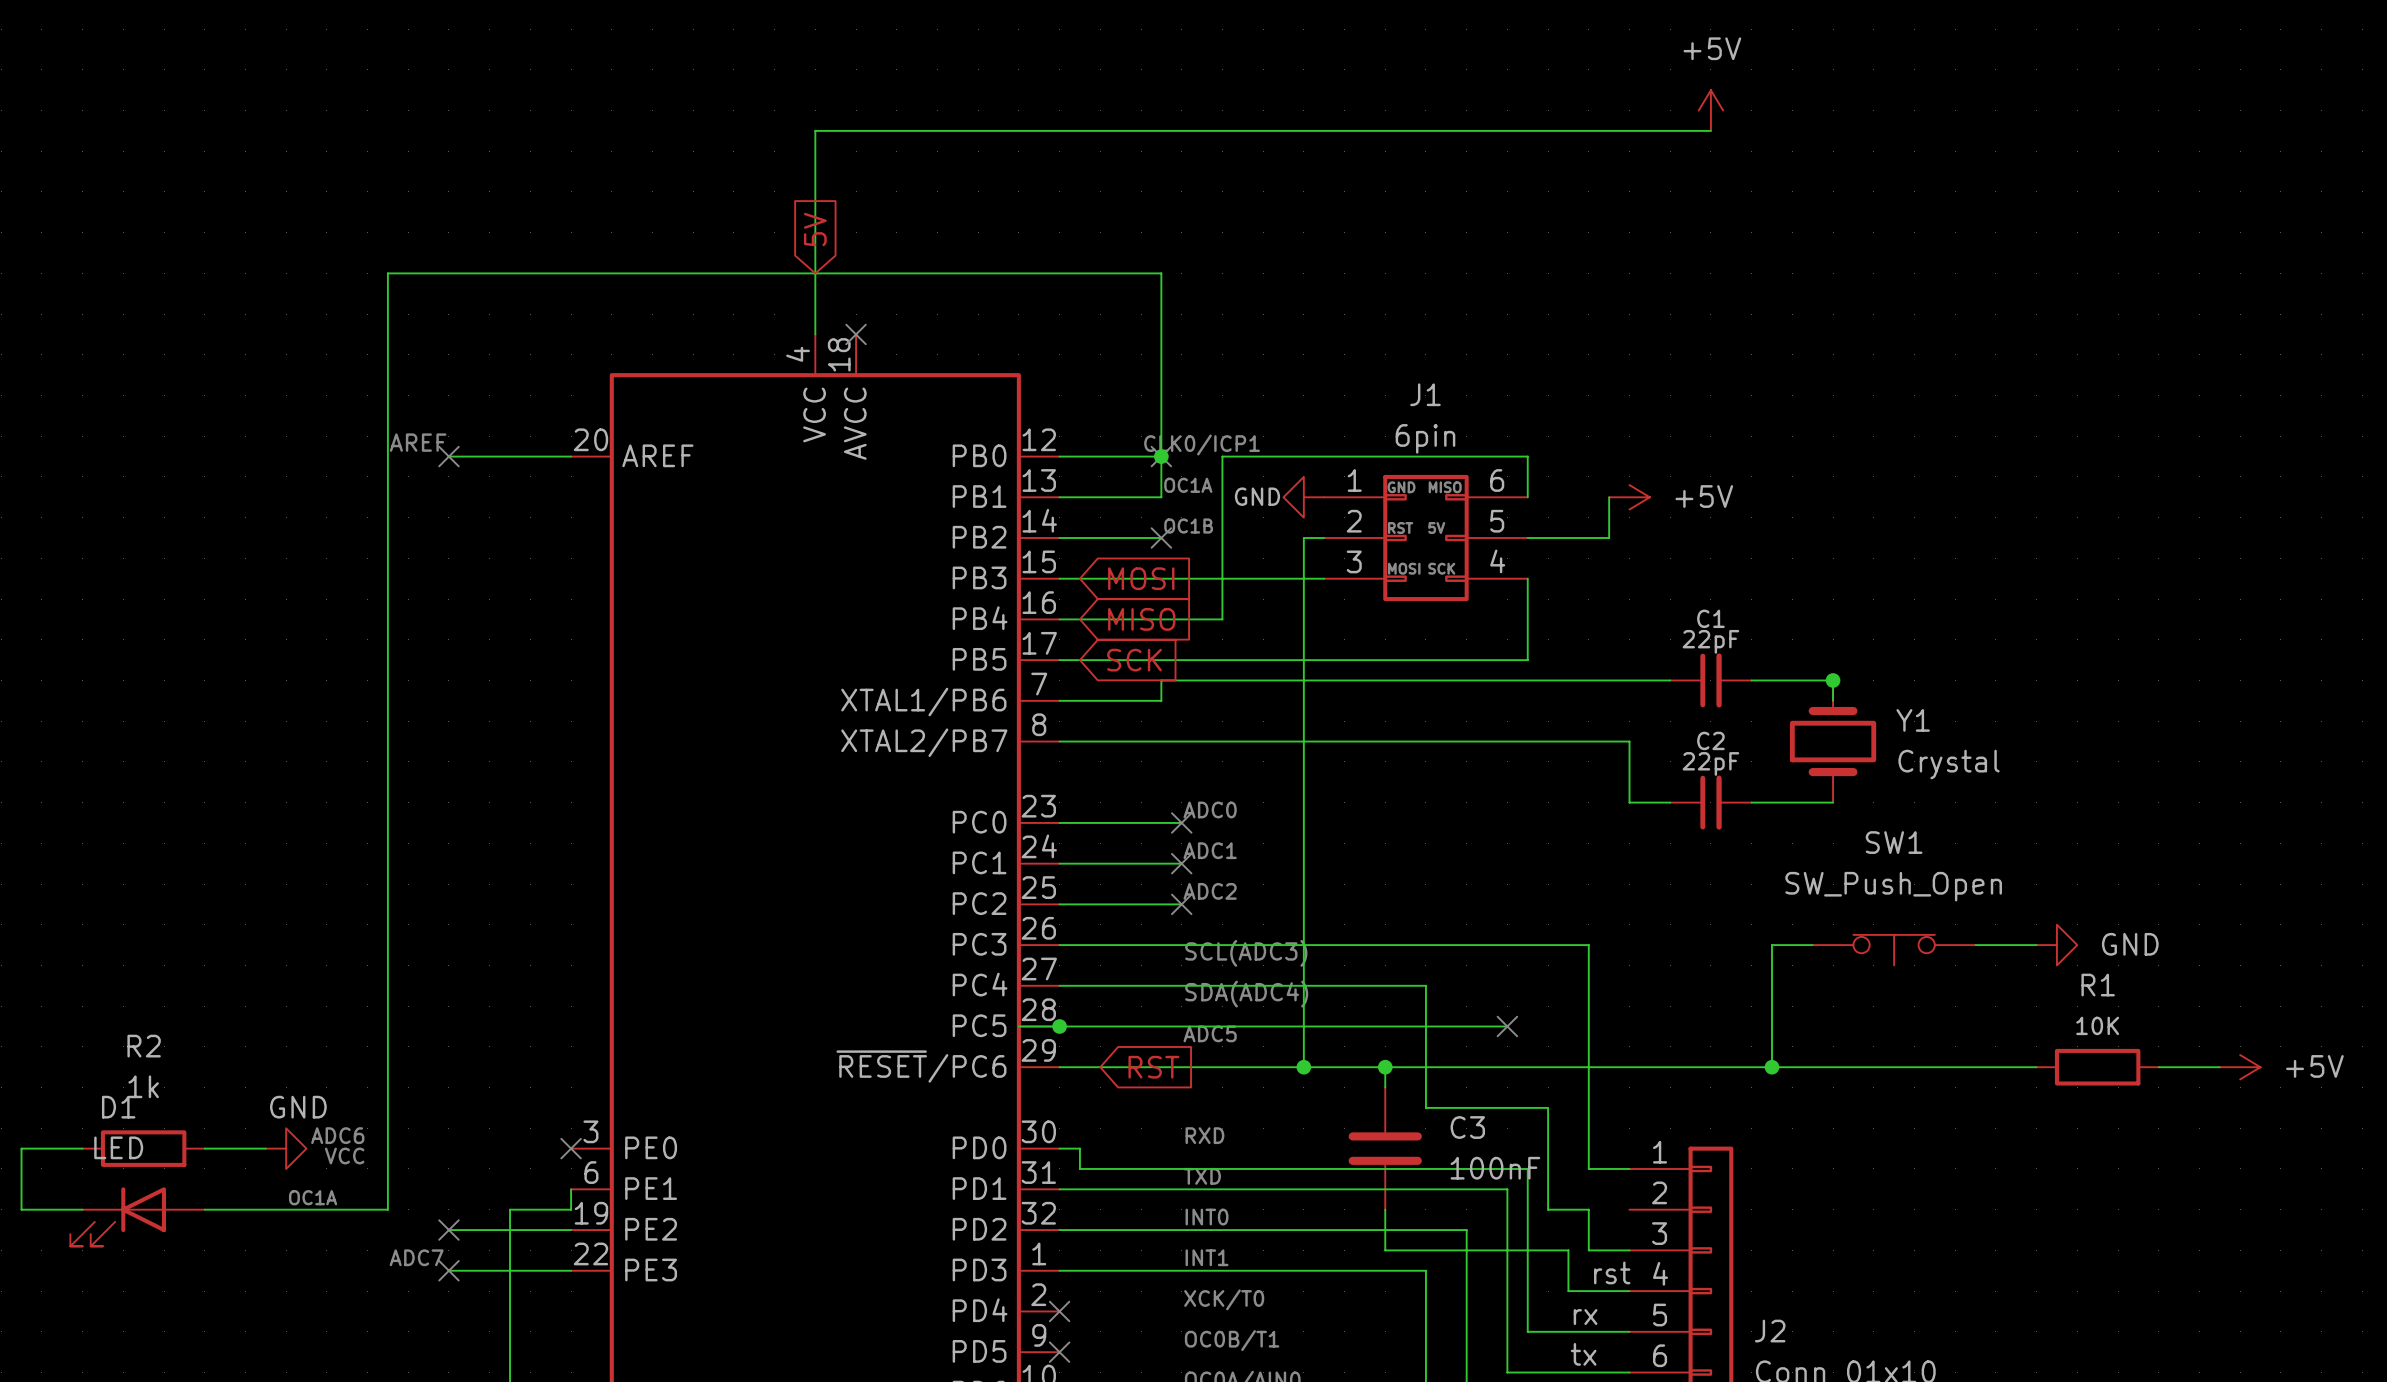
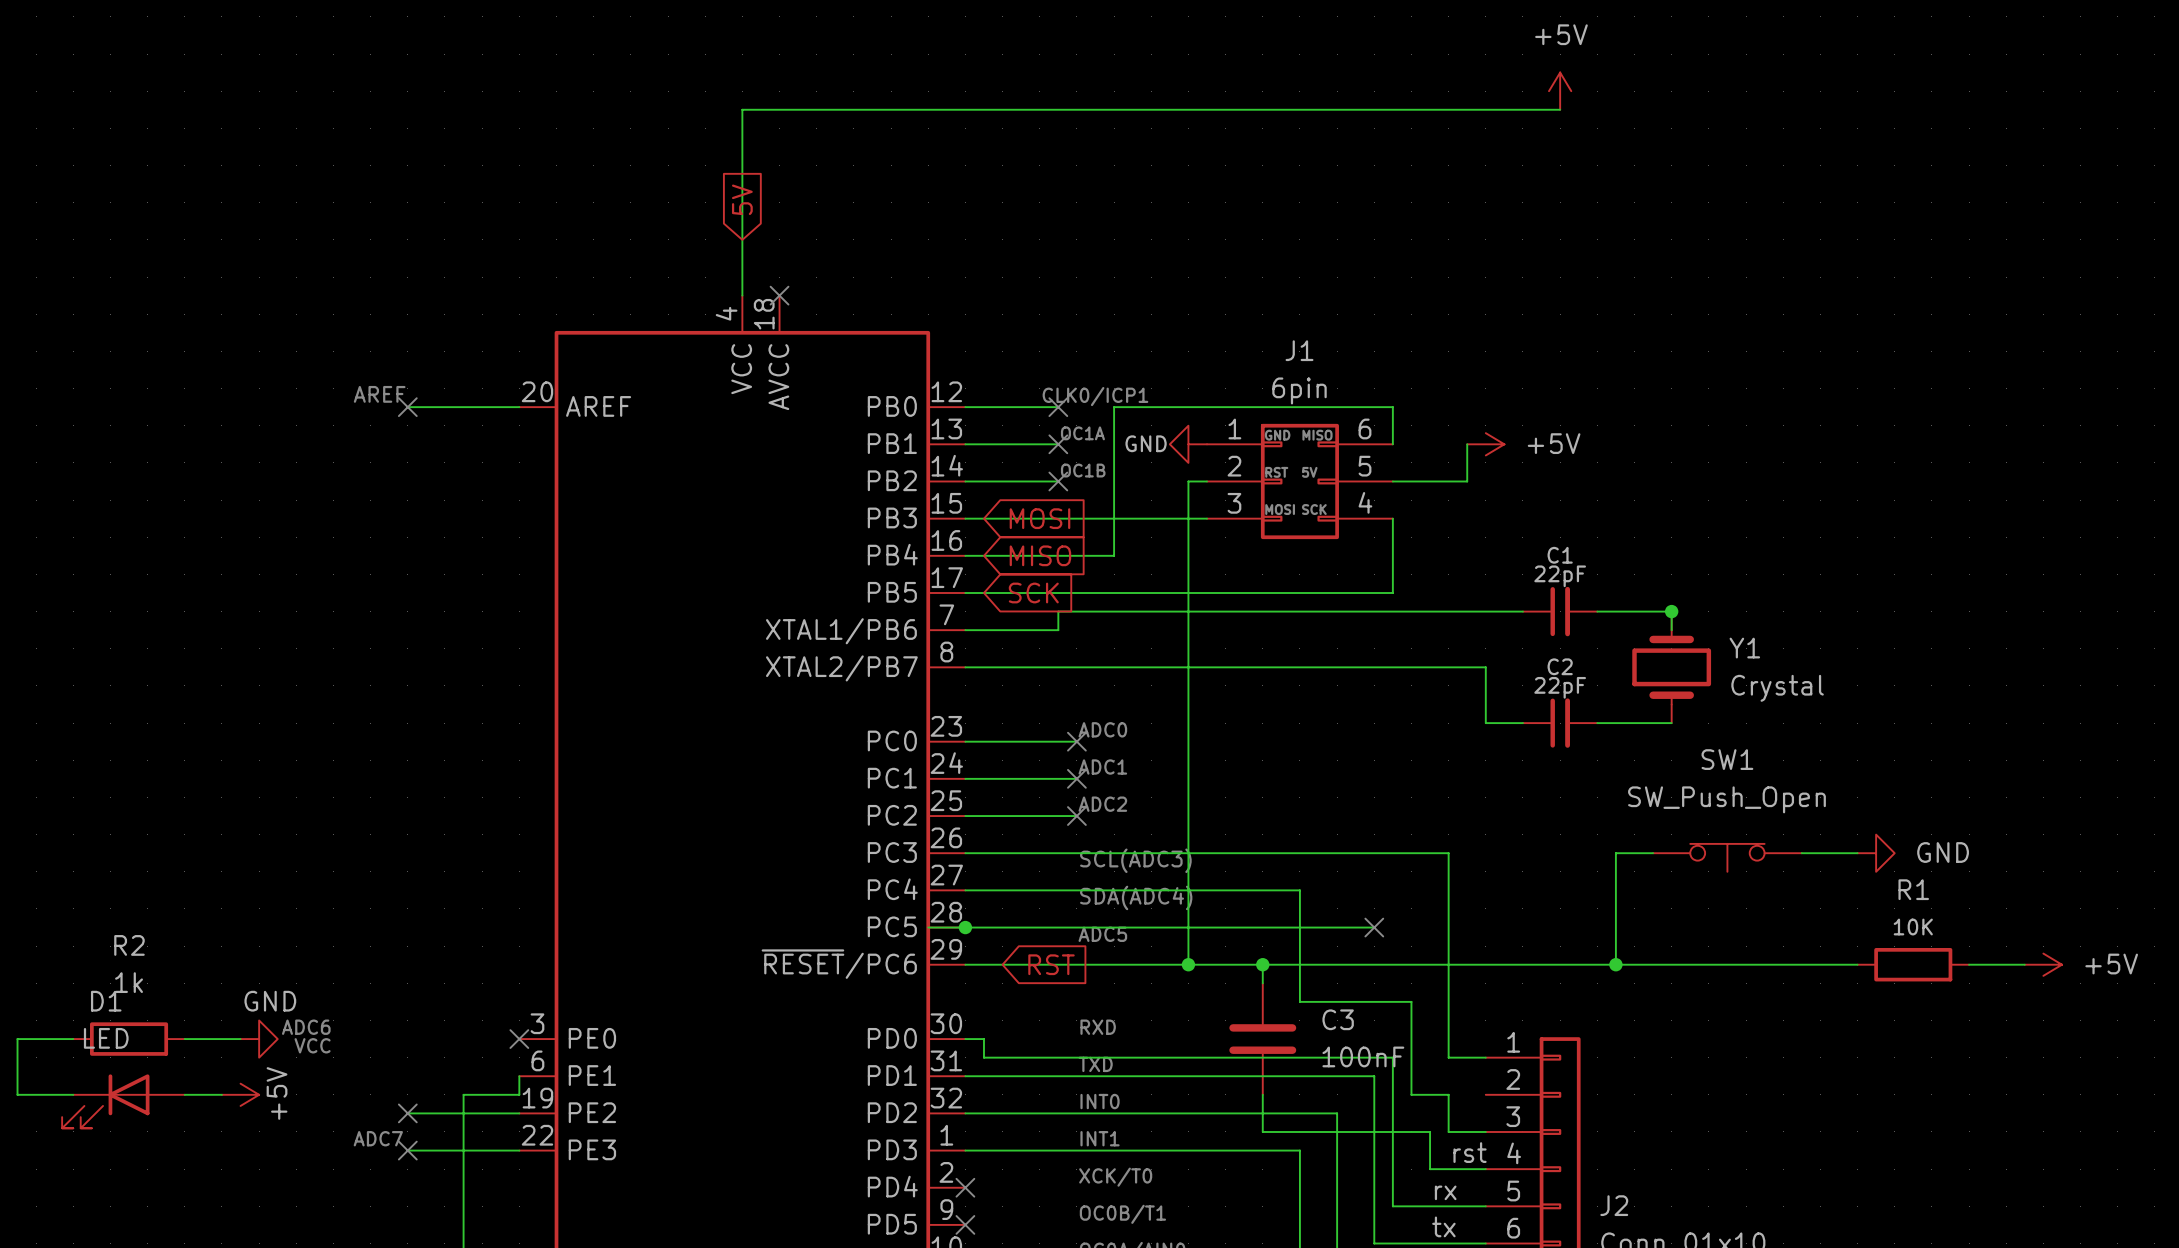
junction: (1161, 456) -> none
wire: (1161, 497) (1161, 273) (387, 273) (387, 1209) (245, 1209) -> none
no-connect mark: none -> (1058, 444)
text: OC1A (313, 1197) -> none
power symbol: none -> +5V (240, 1094)

